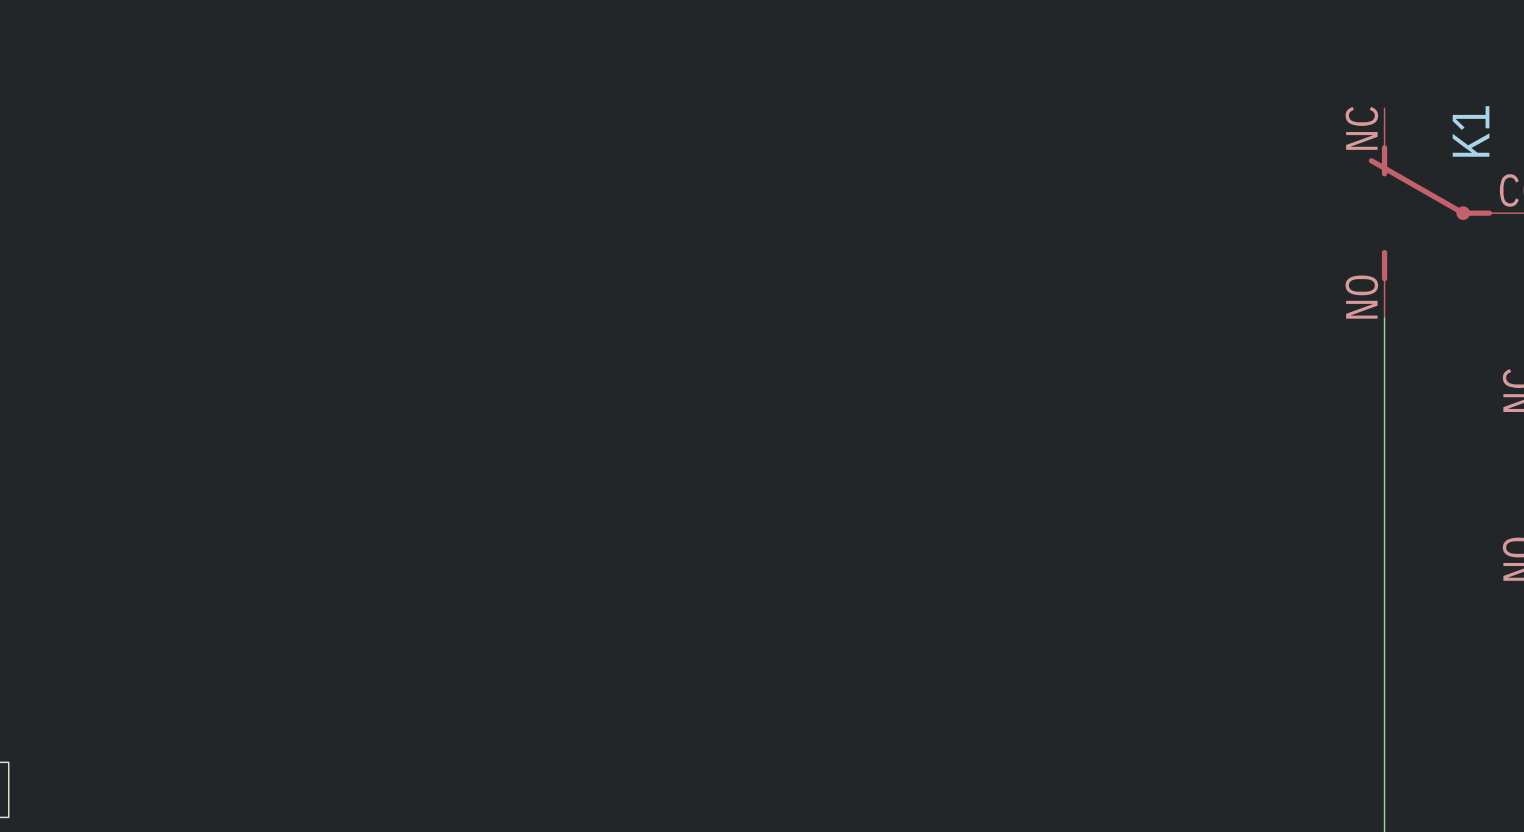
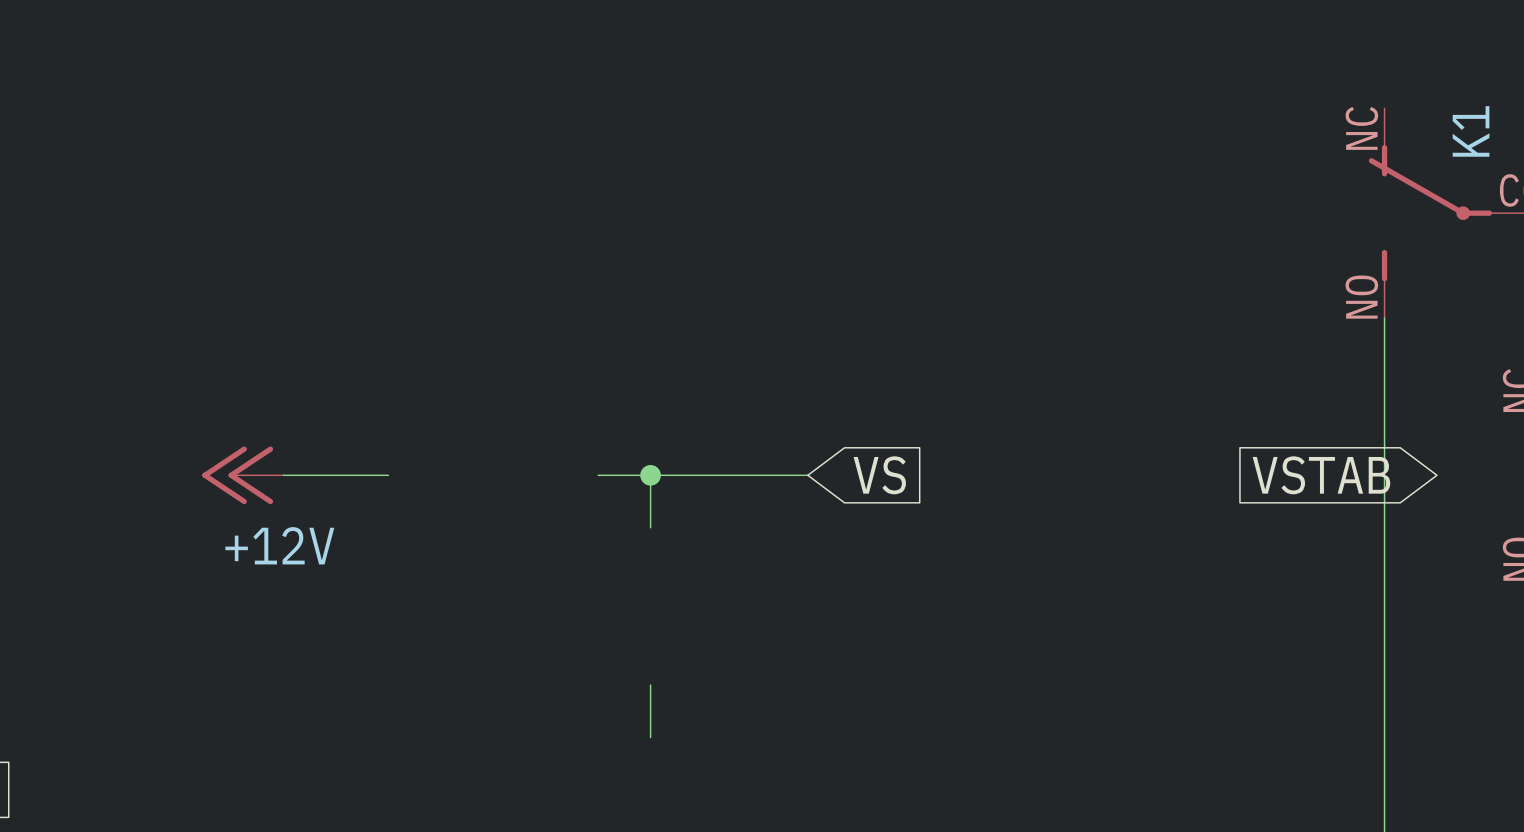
power symbol: none -> +12V (242, 475)
wire: none -> (283, 475) (388, 475)
wire: none -> (598, 475) (807, 475)
wire: none -> (650, 475) (650, 527)
junction: none -> (650, 475)
global label: none -> VS (879, 475)
global label: none -> VSTAB (1321, 475)
wire: none -> (650, 685) (650, 737)

